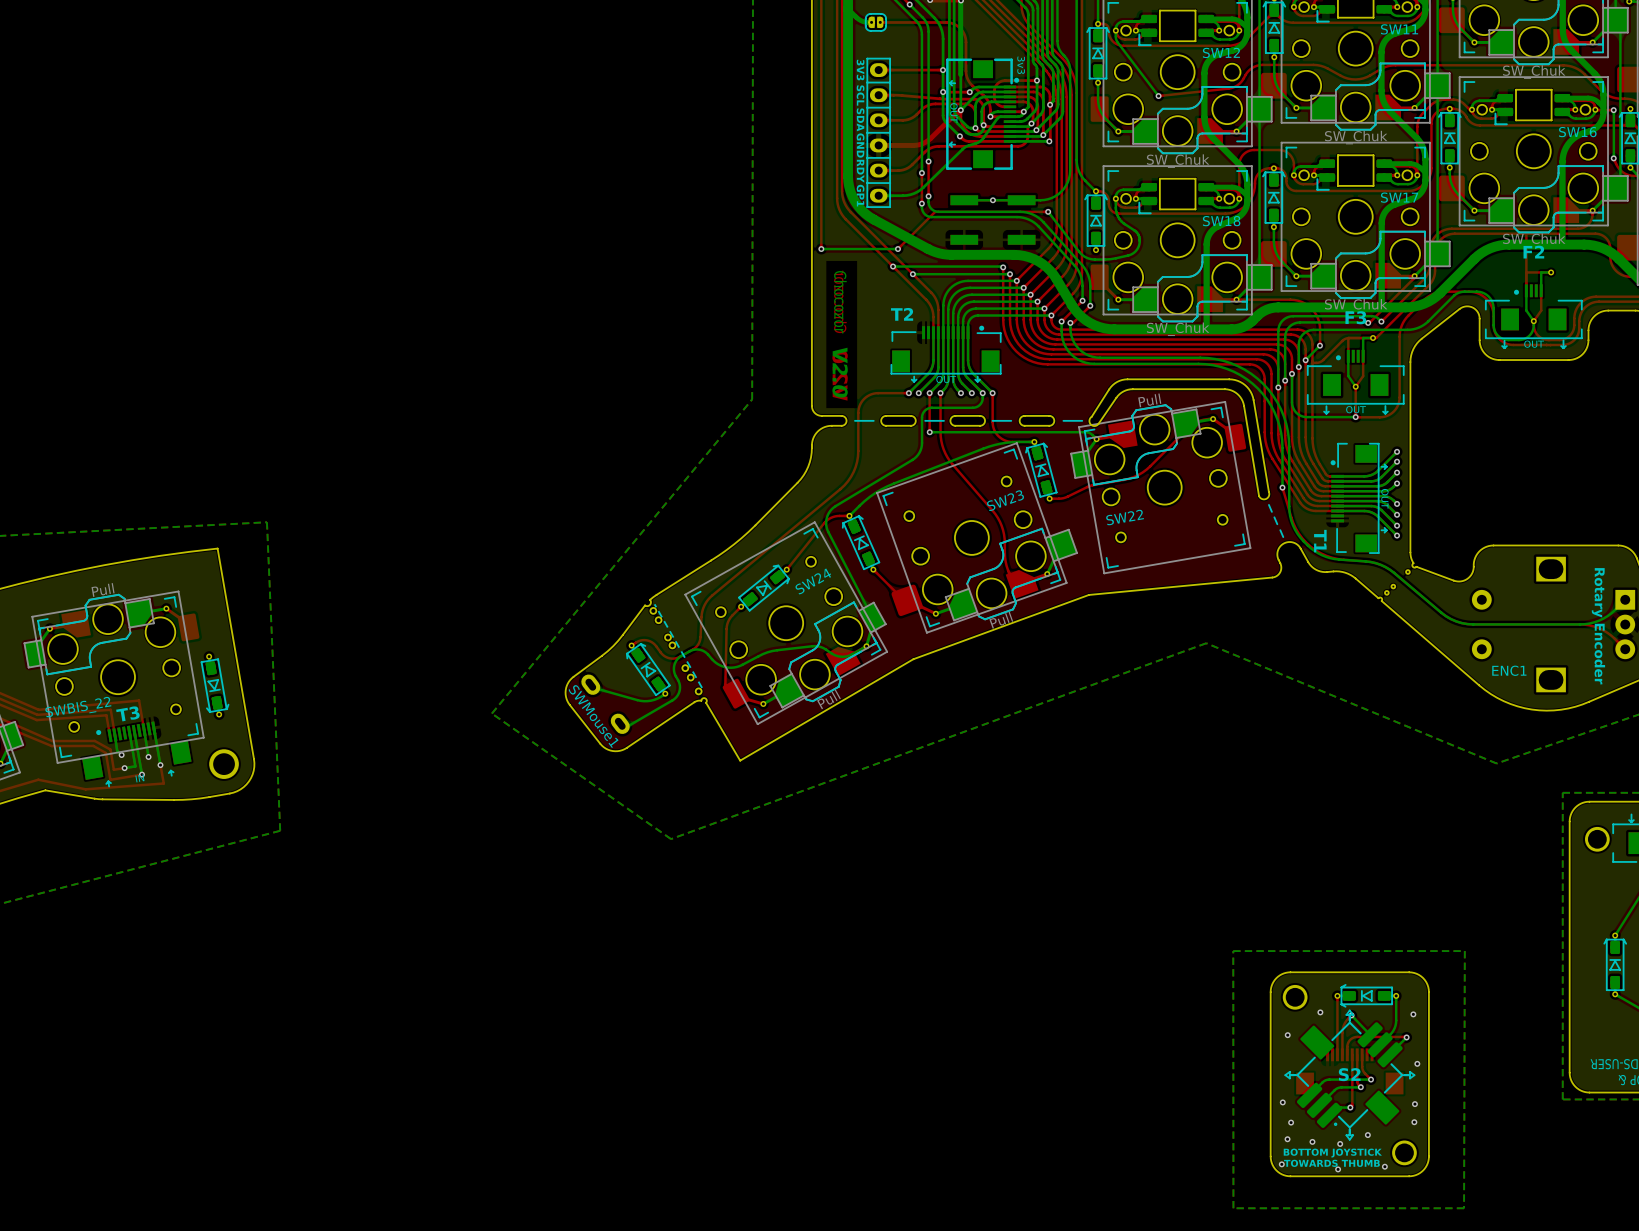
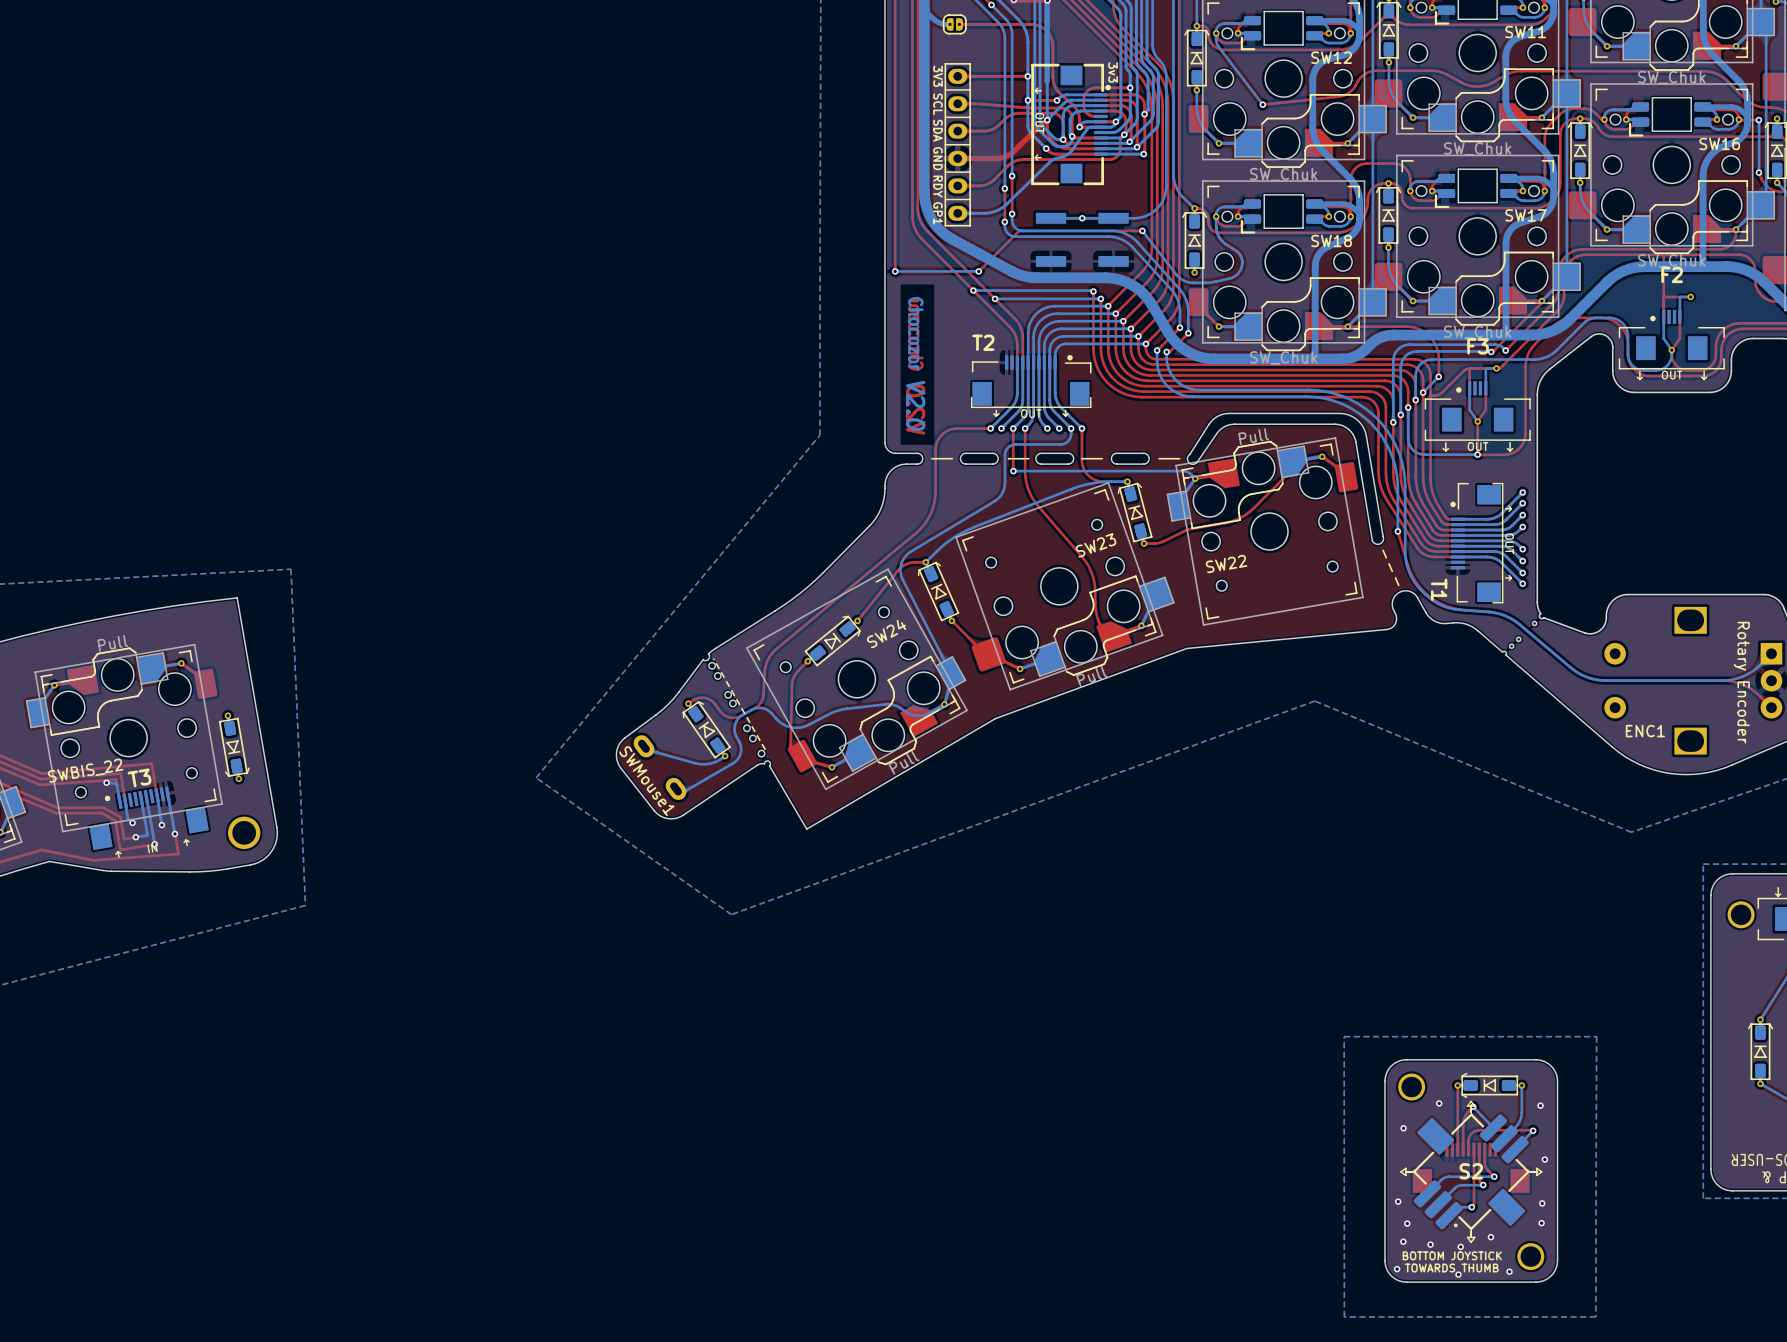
bottom track: none -> (106, 782) (116, 783) (119, 801)
via: none -> (106, 782)

